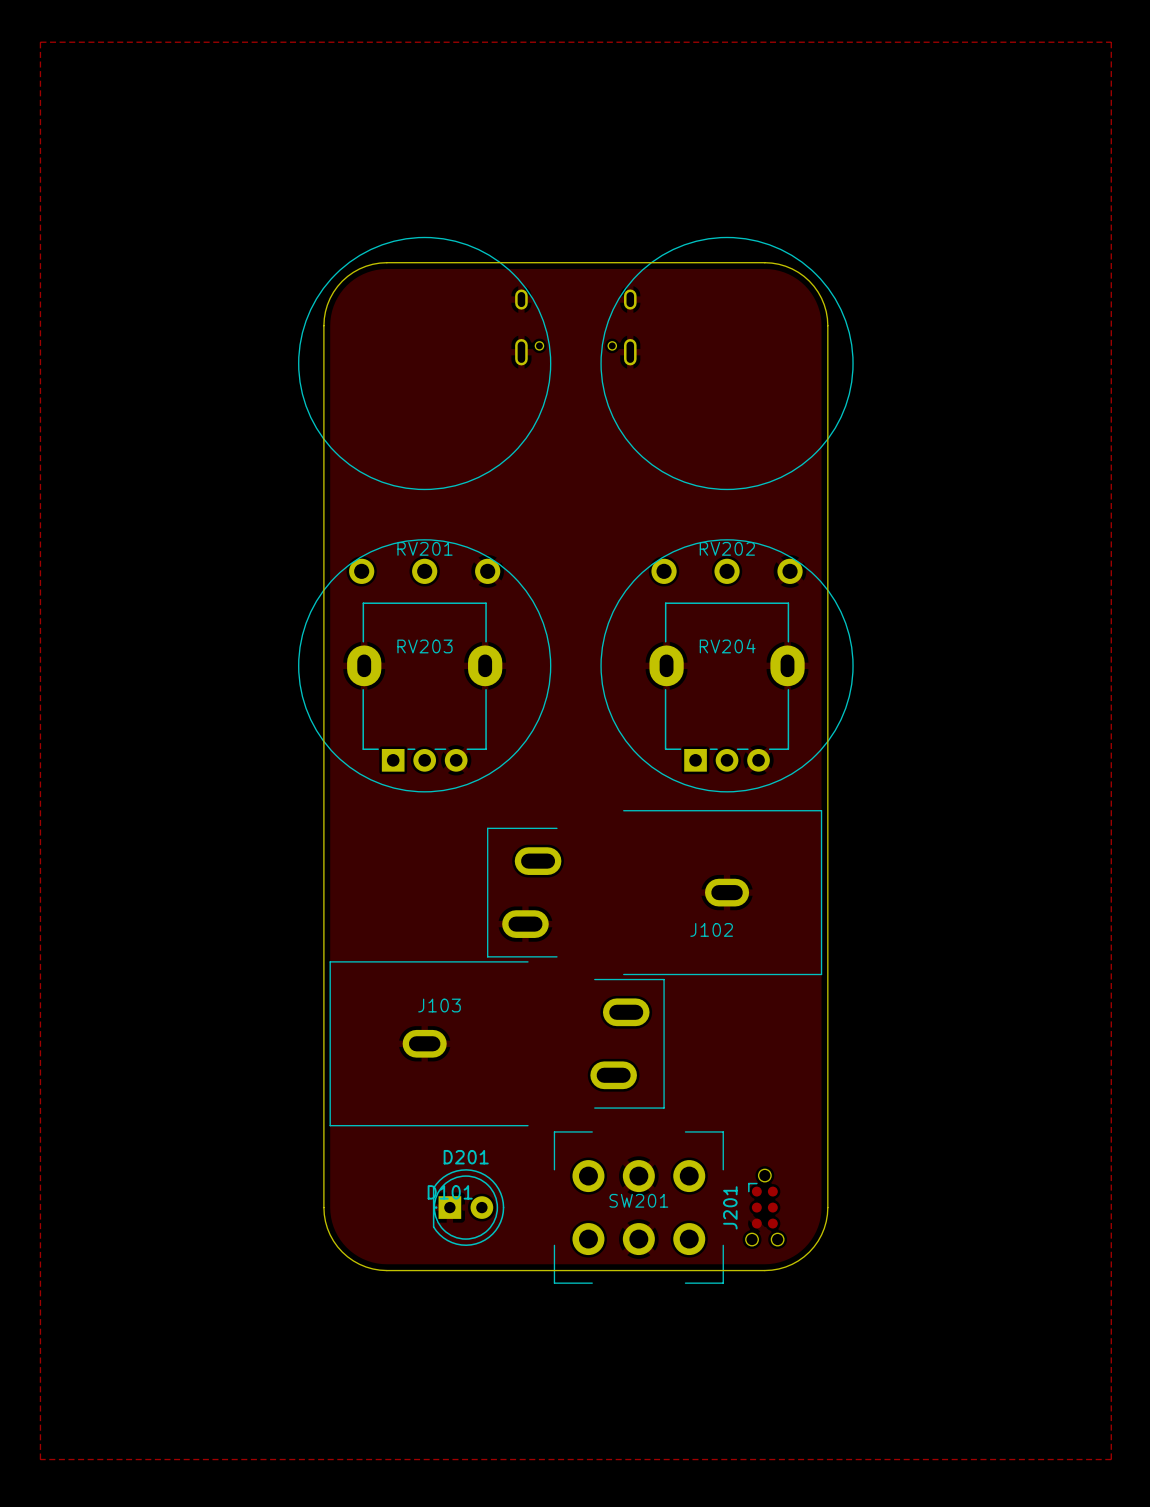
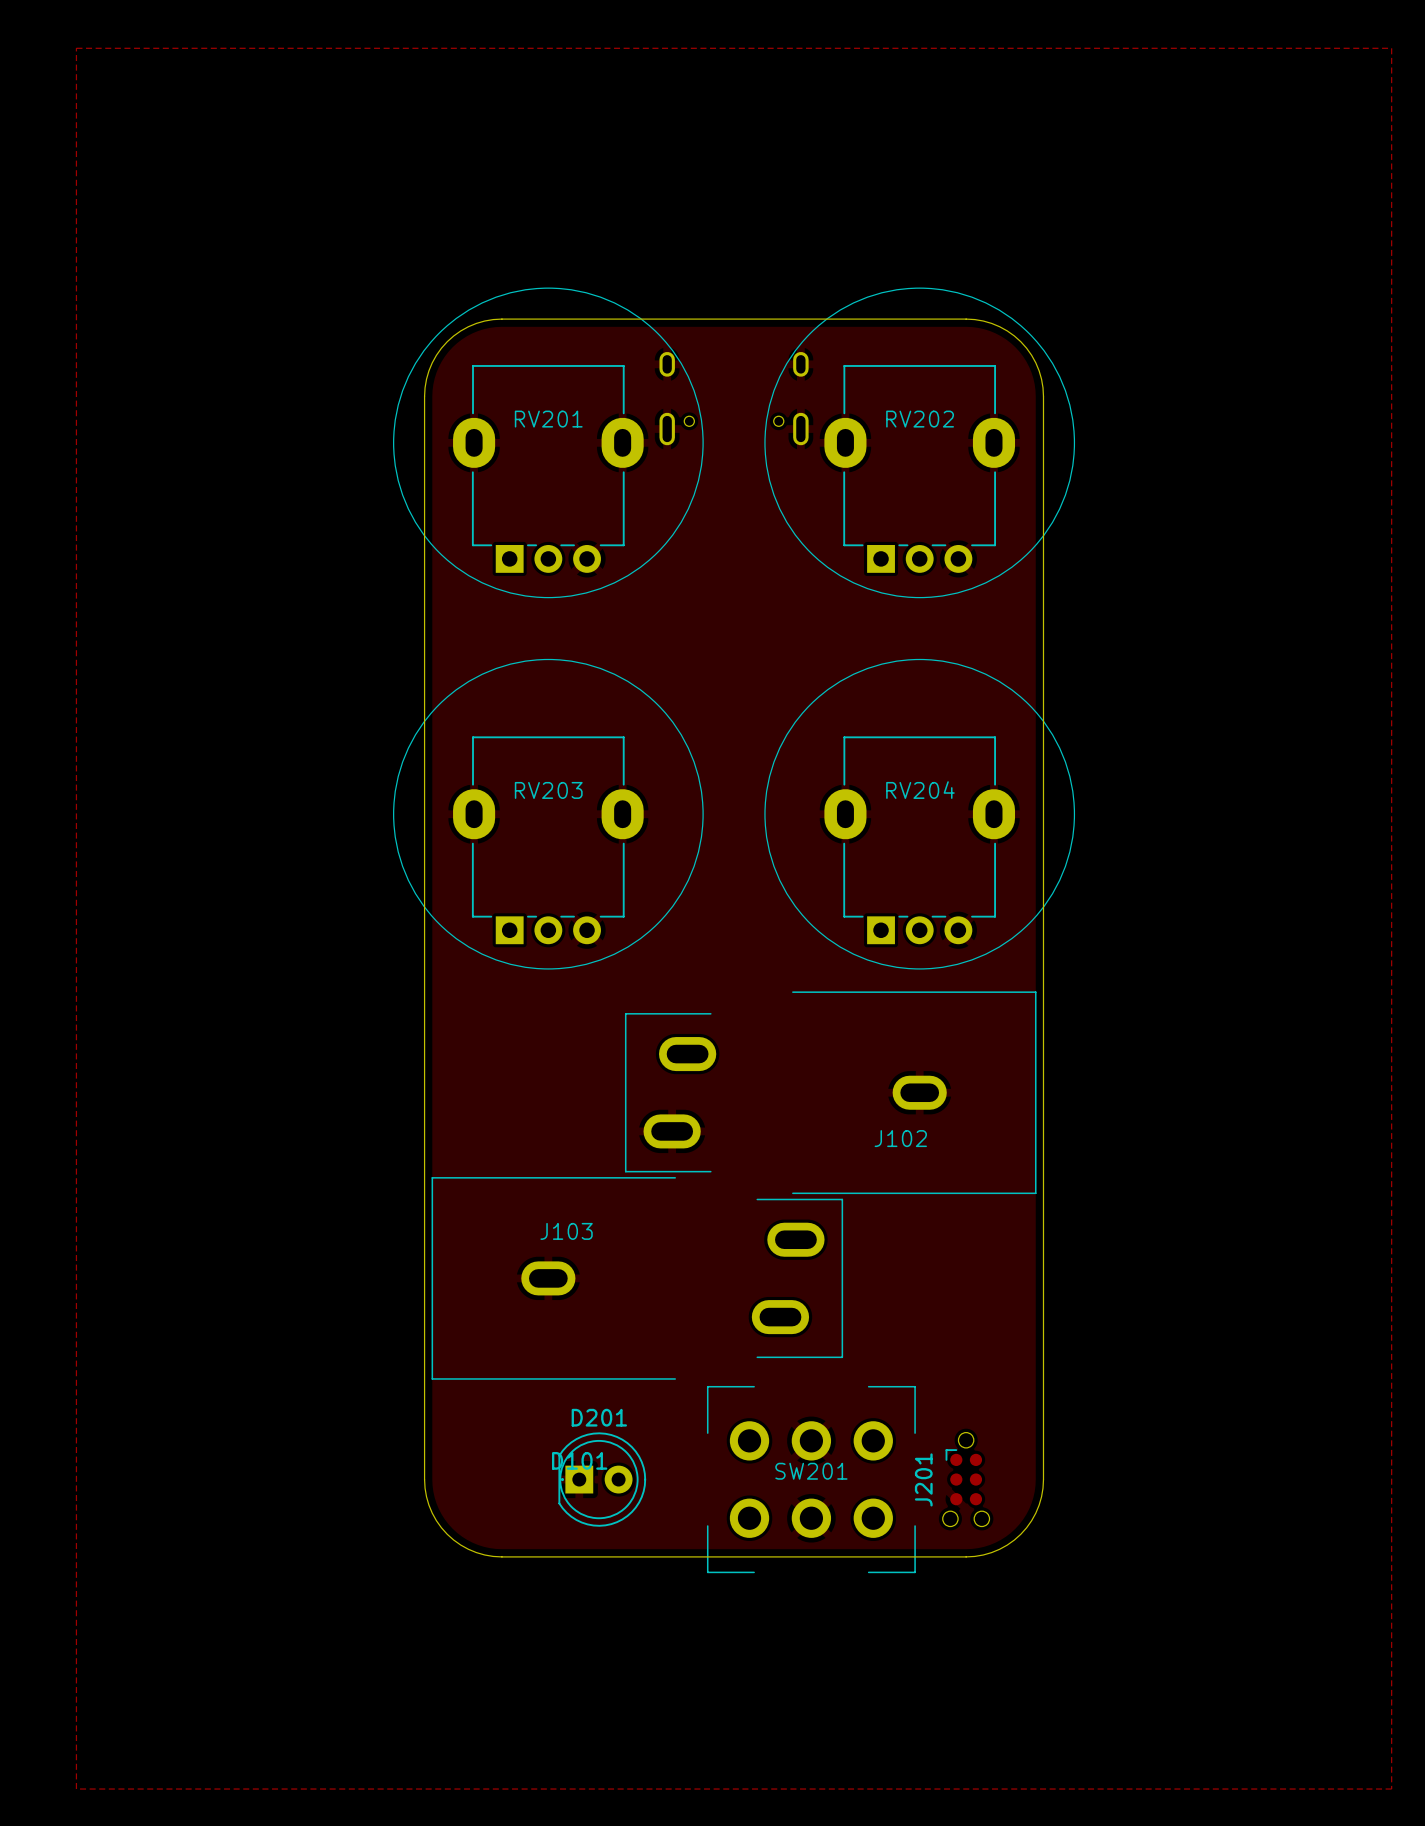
RV201 footprint: [349, 558, 501, 584] -> [453, 365, 644, 573]
RV202 footprint: [651, 558, 803, 584] -> [824, 365, 1016, 573]

